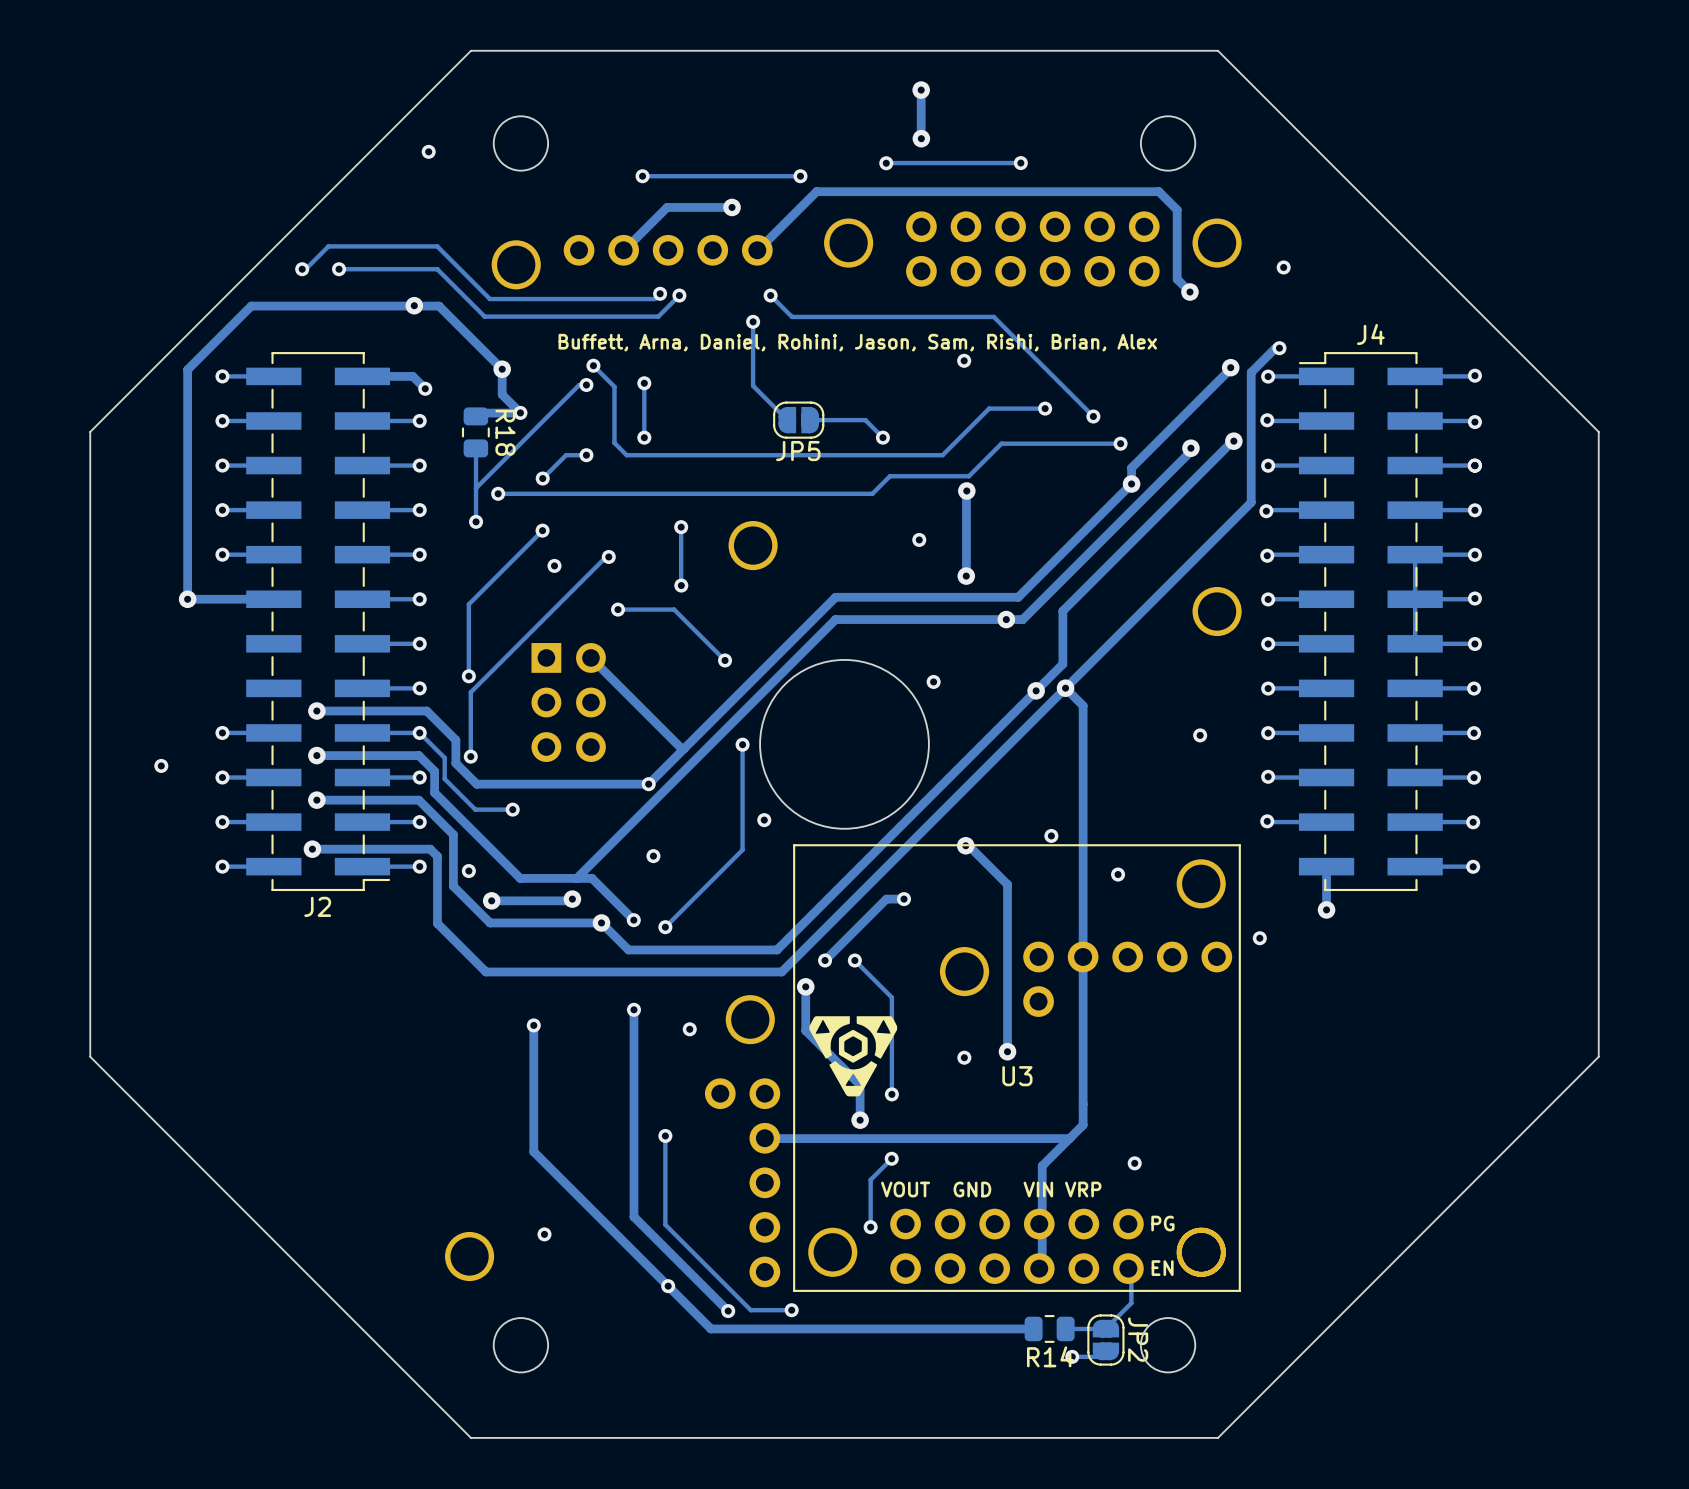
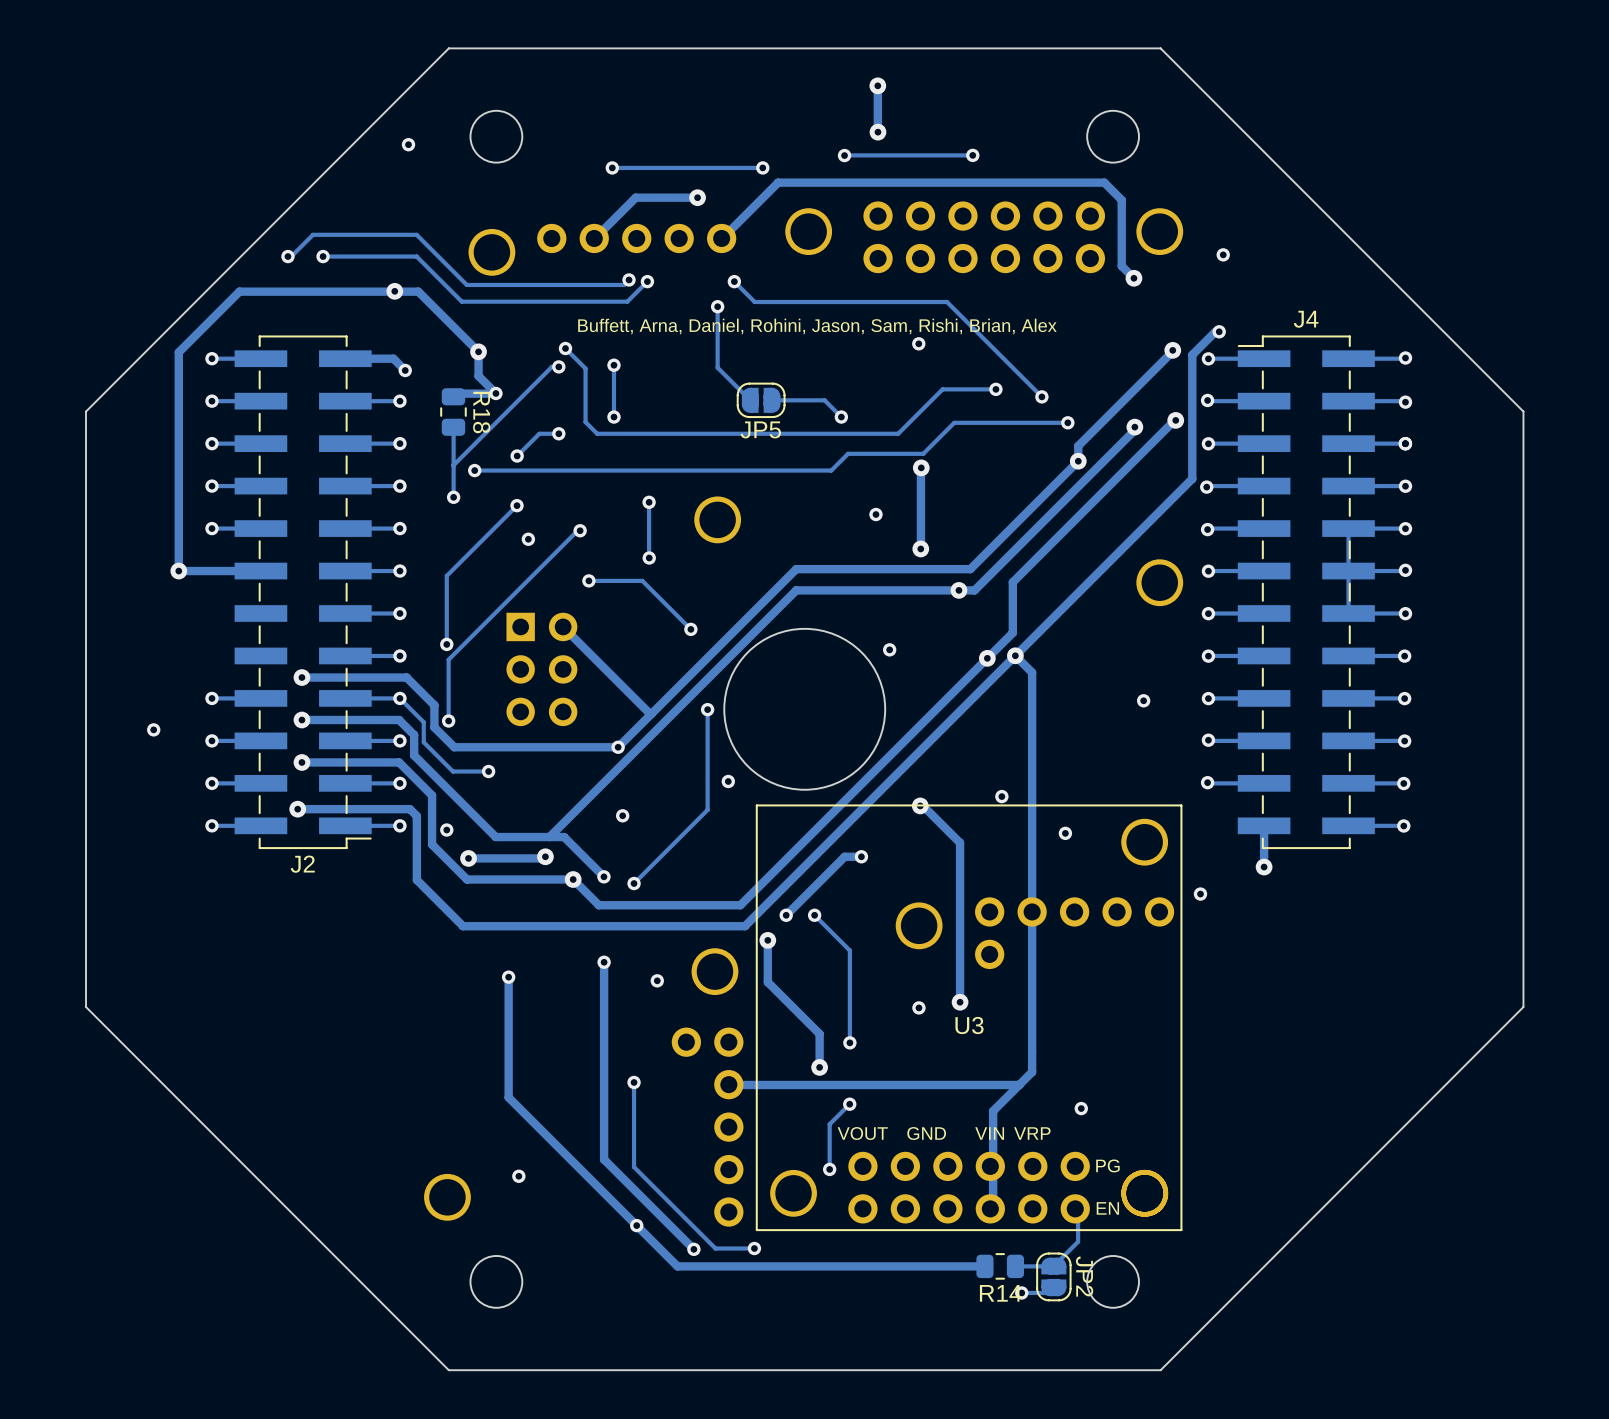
drawing: [809, 1016, 898, 1097] -> none

